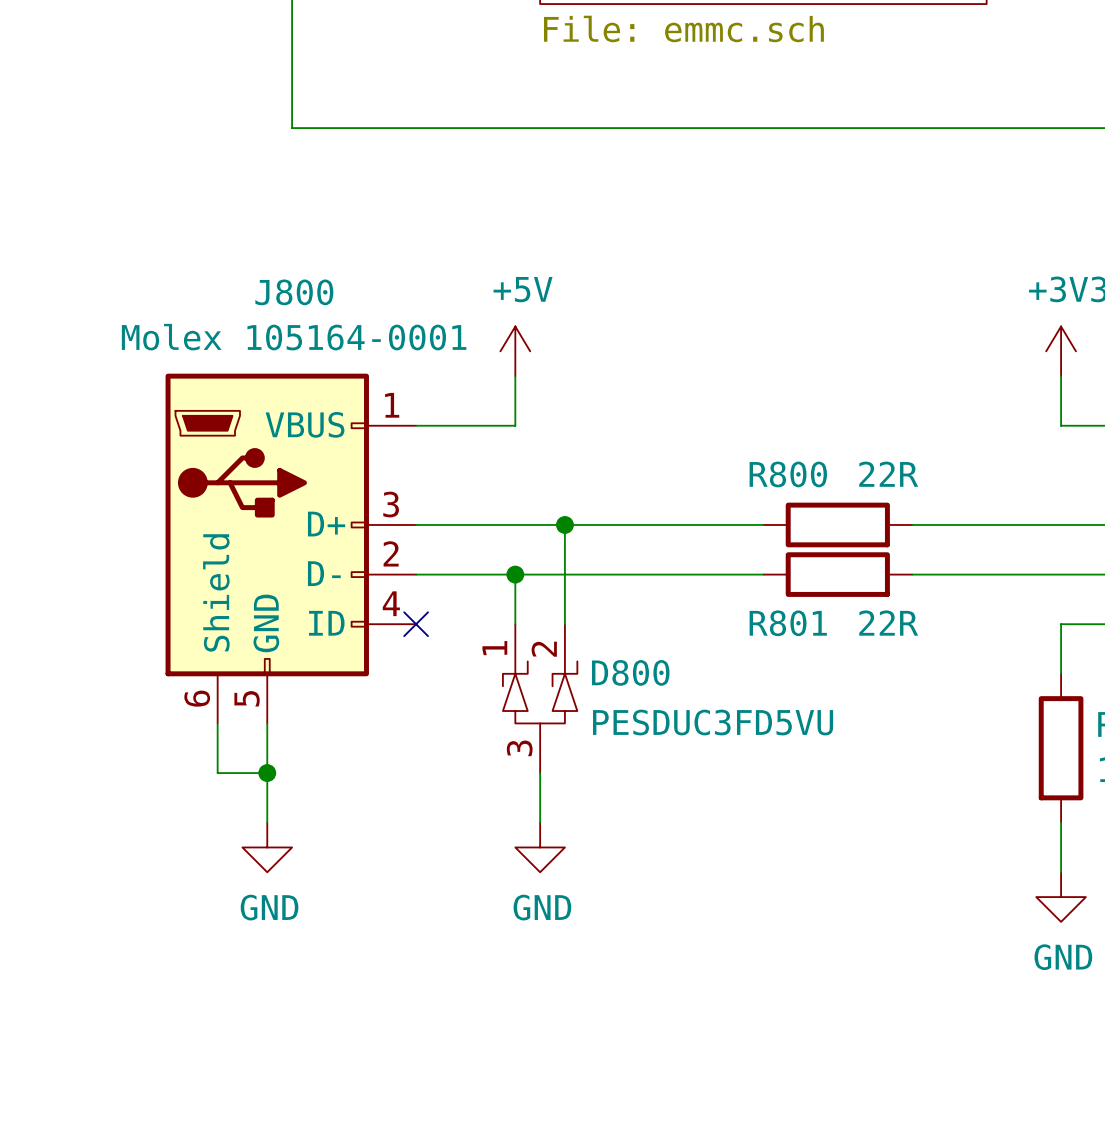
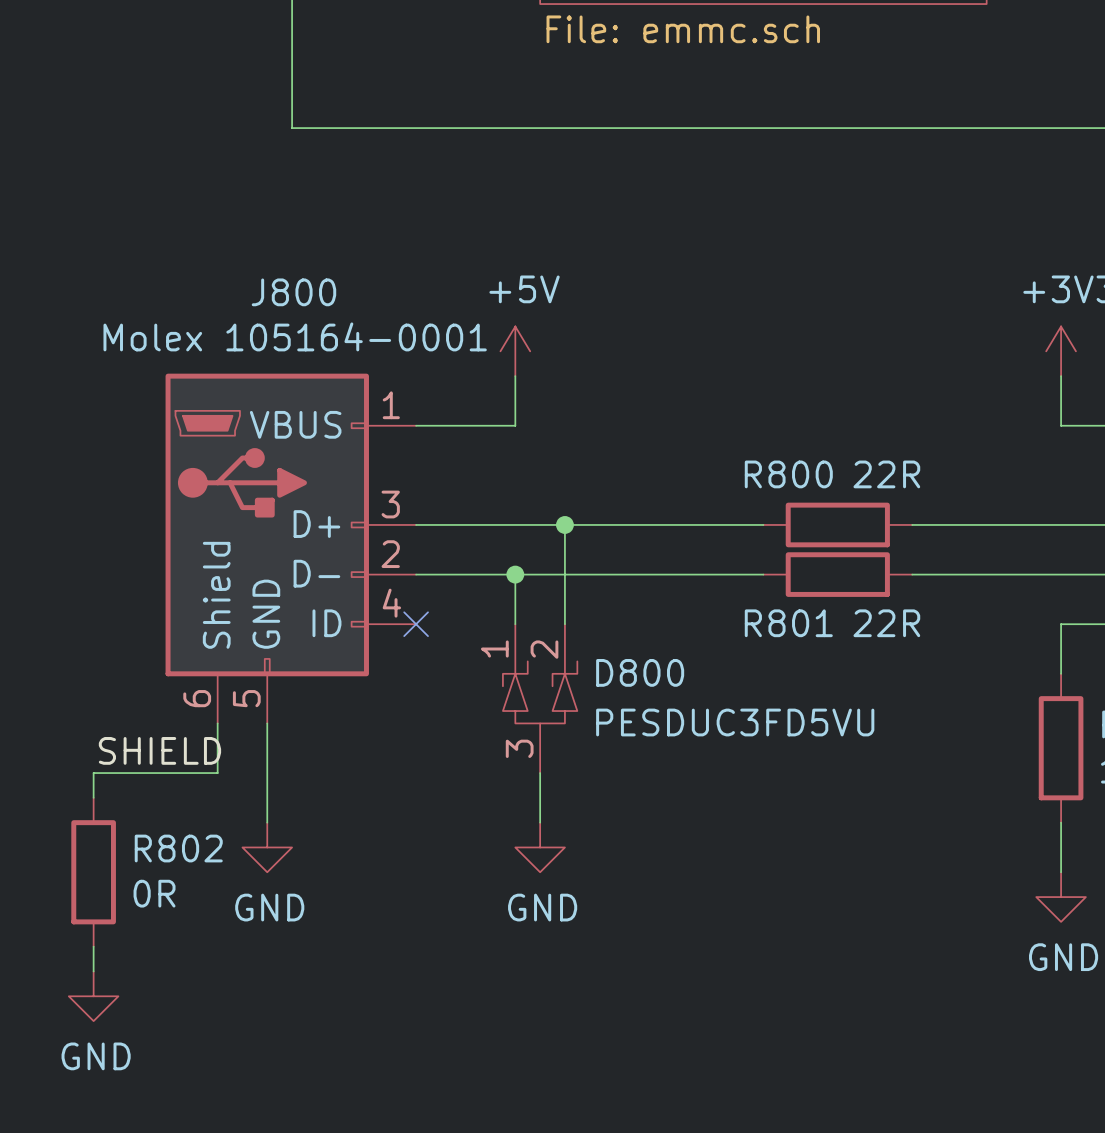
label: none -> SHIELD (159, 750)
wire: (217, 773) (267, 773) -> (217, 773) (93, 773) (93, 797)
junction: (267, 773) -> none
R802: none -> 0R (93, 872)
wire: none -> (93, 946) (93, 971)
power symbol: none -> GND (93, 996)

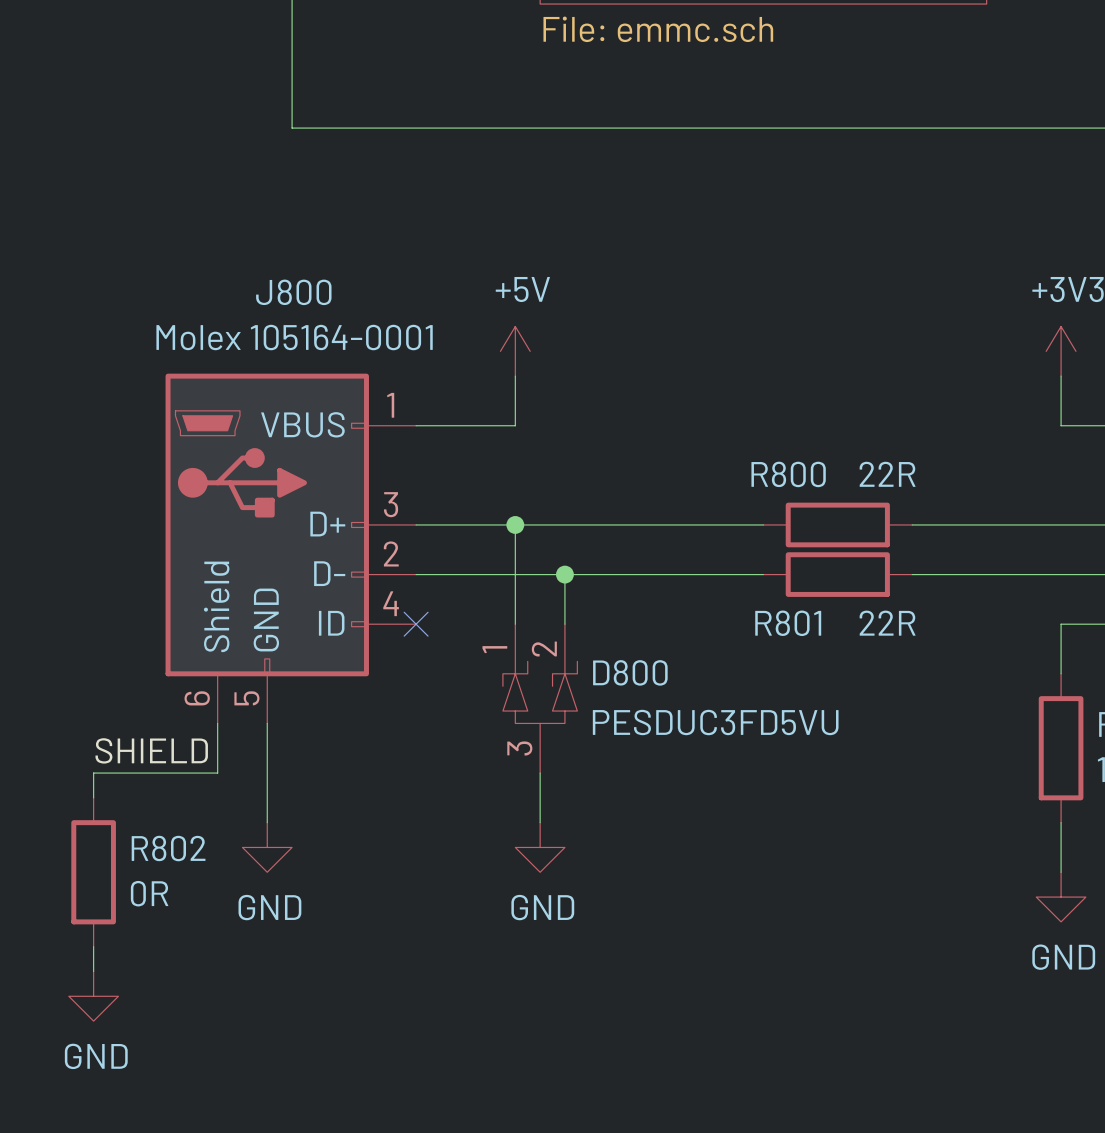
junction: none -> (515, 524)
wire: (564, 524) (564, 574) -> (515, 524) (515, 574)
junction: (564, 524) -> none
junction: (515, 574) -> none
junction: none -> (564, 574)

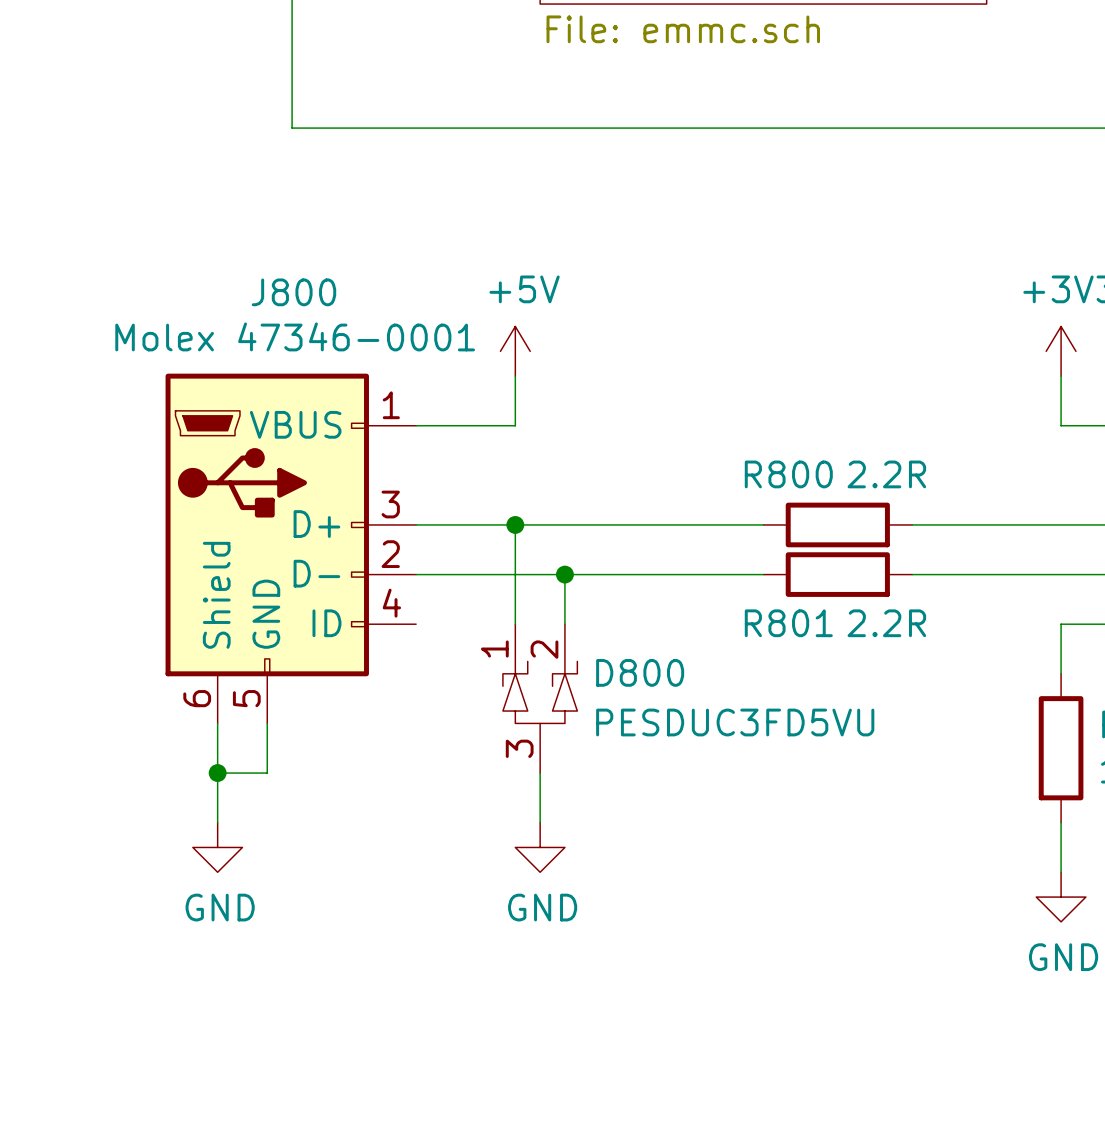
J800 value: Molex 105164-0001 (294, 337) -> Molex 47346-0001 (295, 336)
R800 value: 22R (887, 474) -> 2.2R (886, 474)
R801 value: 22R (887, 623) -> 2.2R (886, 623)
no-connect mark: (416, 624) -> none
label: SHIELD (151, 750) -> none
wire: (217, 773) (93, 773) (93, 797) -> none
junction: none -> (217, 773)
wire: (267, 773) (267, 822) -> (267, 773) (217, 773) (217, 822)
power symbol position: GND (267, 847) -> GND (217, 847)
R802: 0R (93, 872) -> none
wire: (93, 946) (93, 971) -> none
power symbol: GND (93, 996) -> none

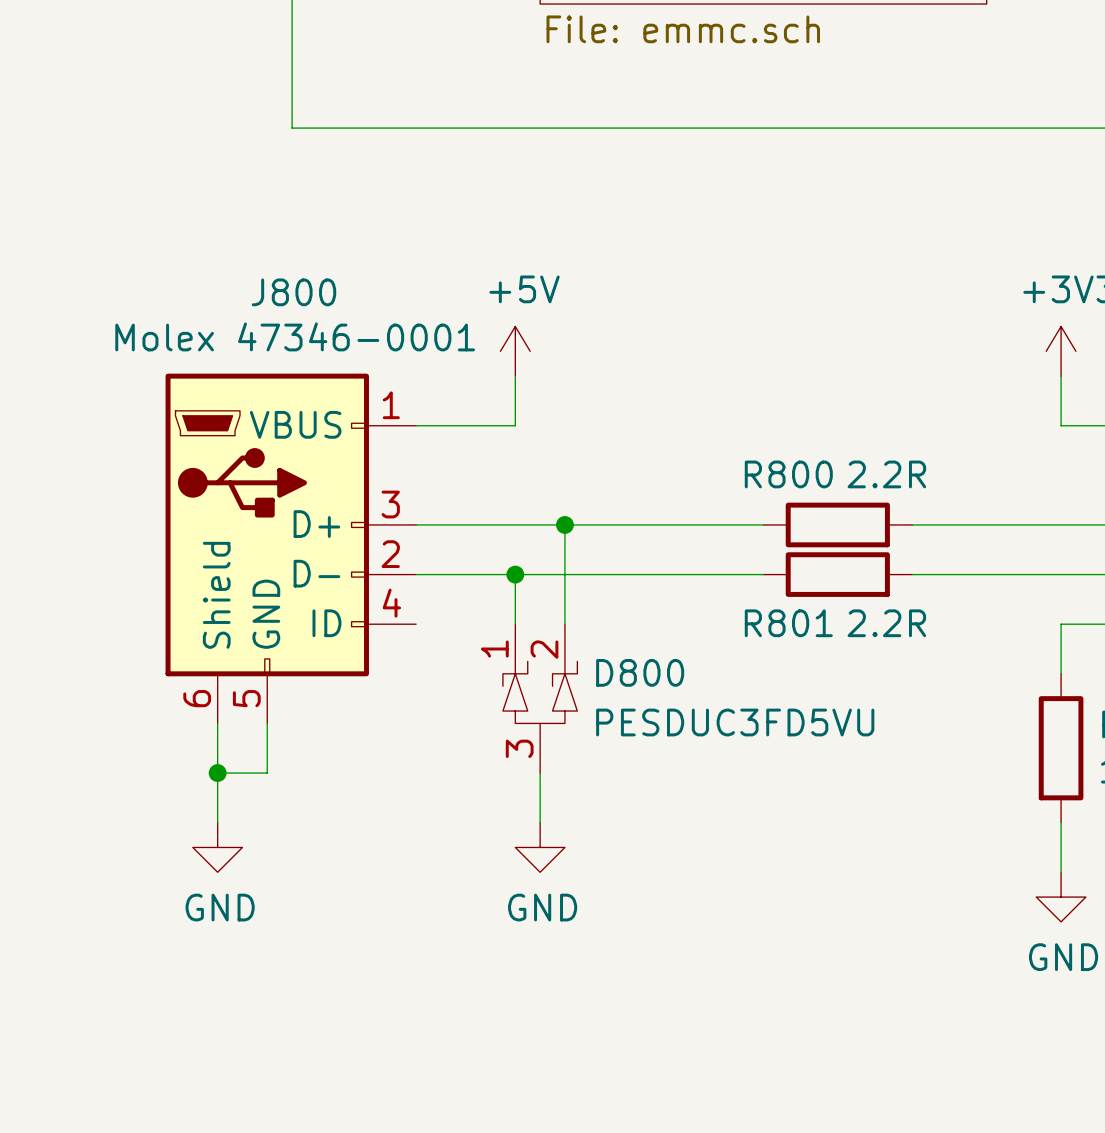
wire: (515, 524) (515, 574) -> (564, 524) (564, 574)
junction: (515, 524) -> none
junction: none -> (564, 524)
junction: none -> (515, 574)
junction: (564, 574) -> none

